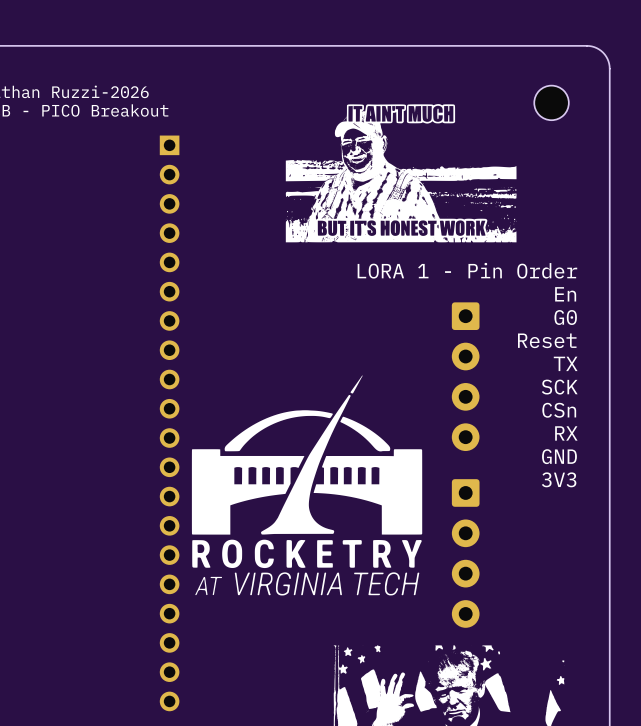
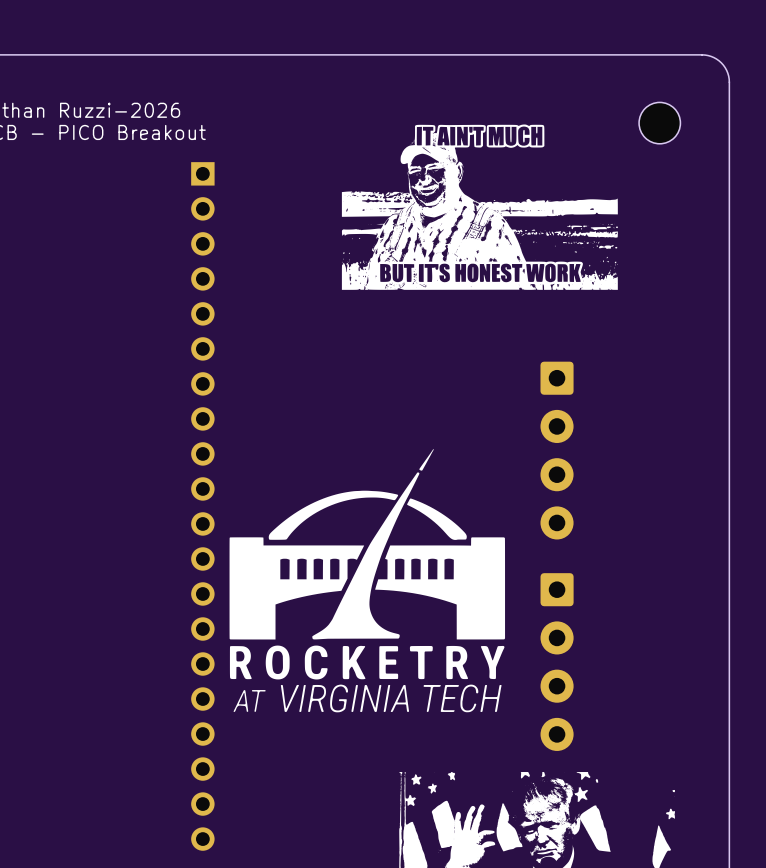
text: LORA 1 - Pin Order (467, 270) -> none
text: En (565, 294) -> none
text: G0 (565, 317) -> none
text: Reset (547, 340) -> none
text: TX (565, 363) -> none
text: SCK (559, 387) -> none
text: CSn (559, 410) -> none
text: RX (566, 433) -> none
text: GND (559, 456) -> none
text: 3V3 (559, 479) -> none

